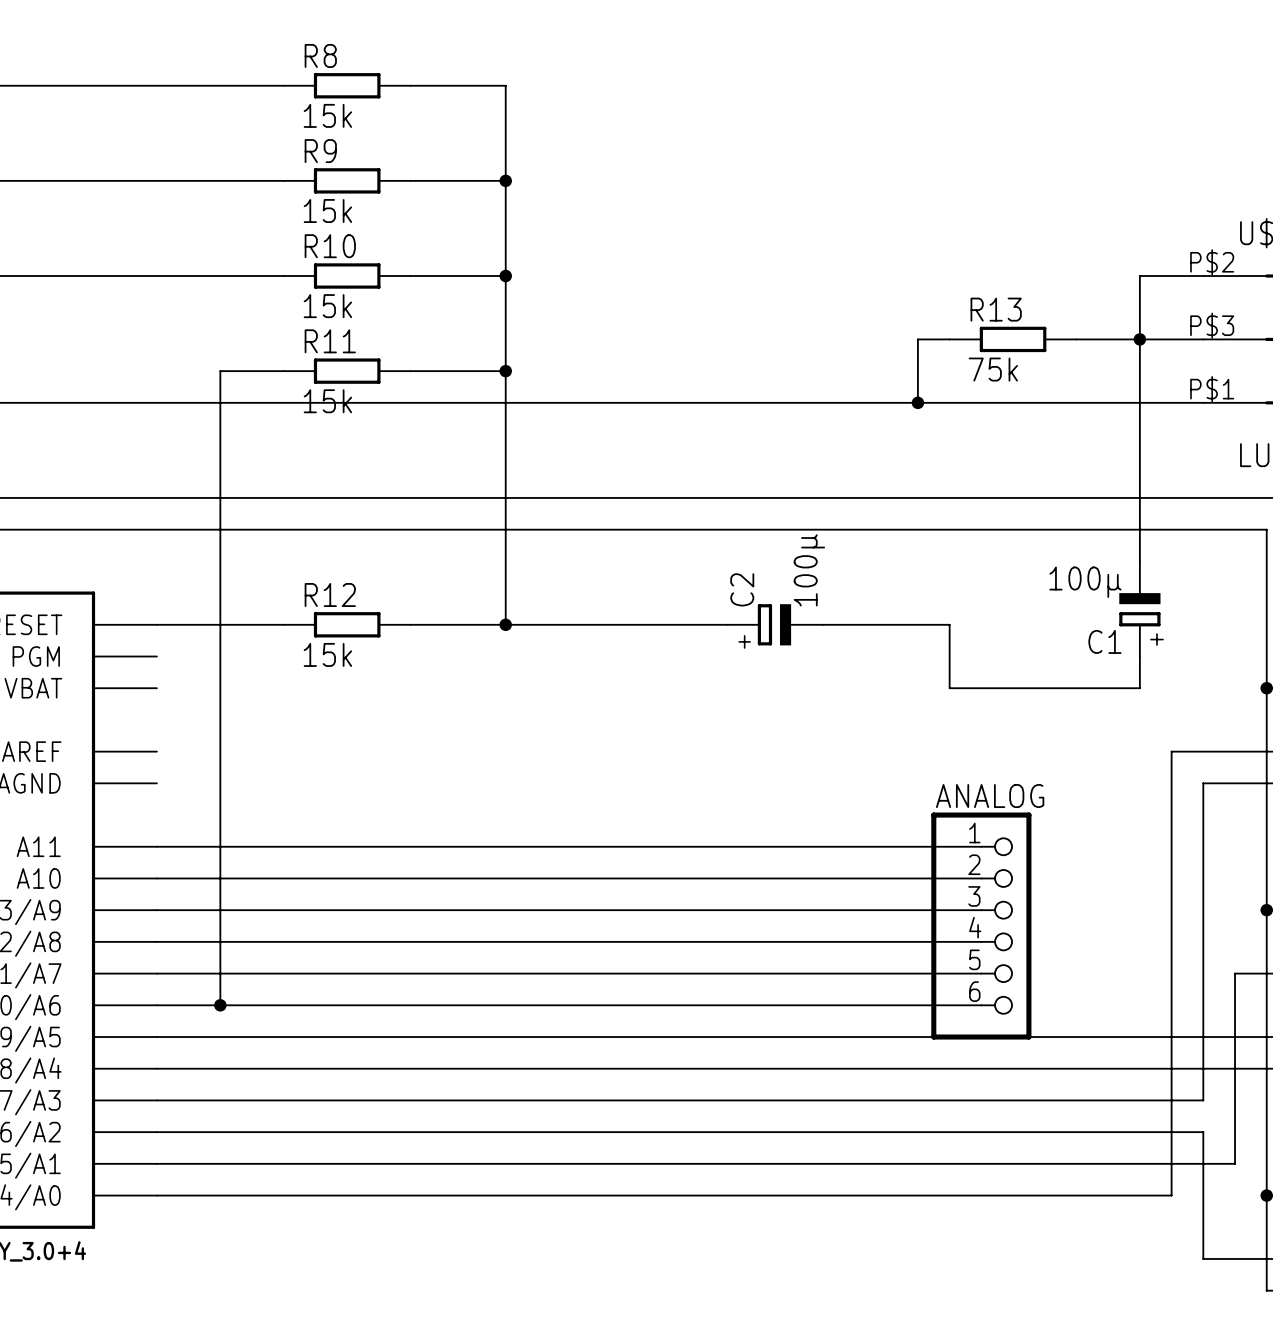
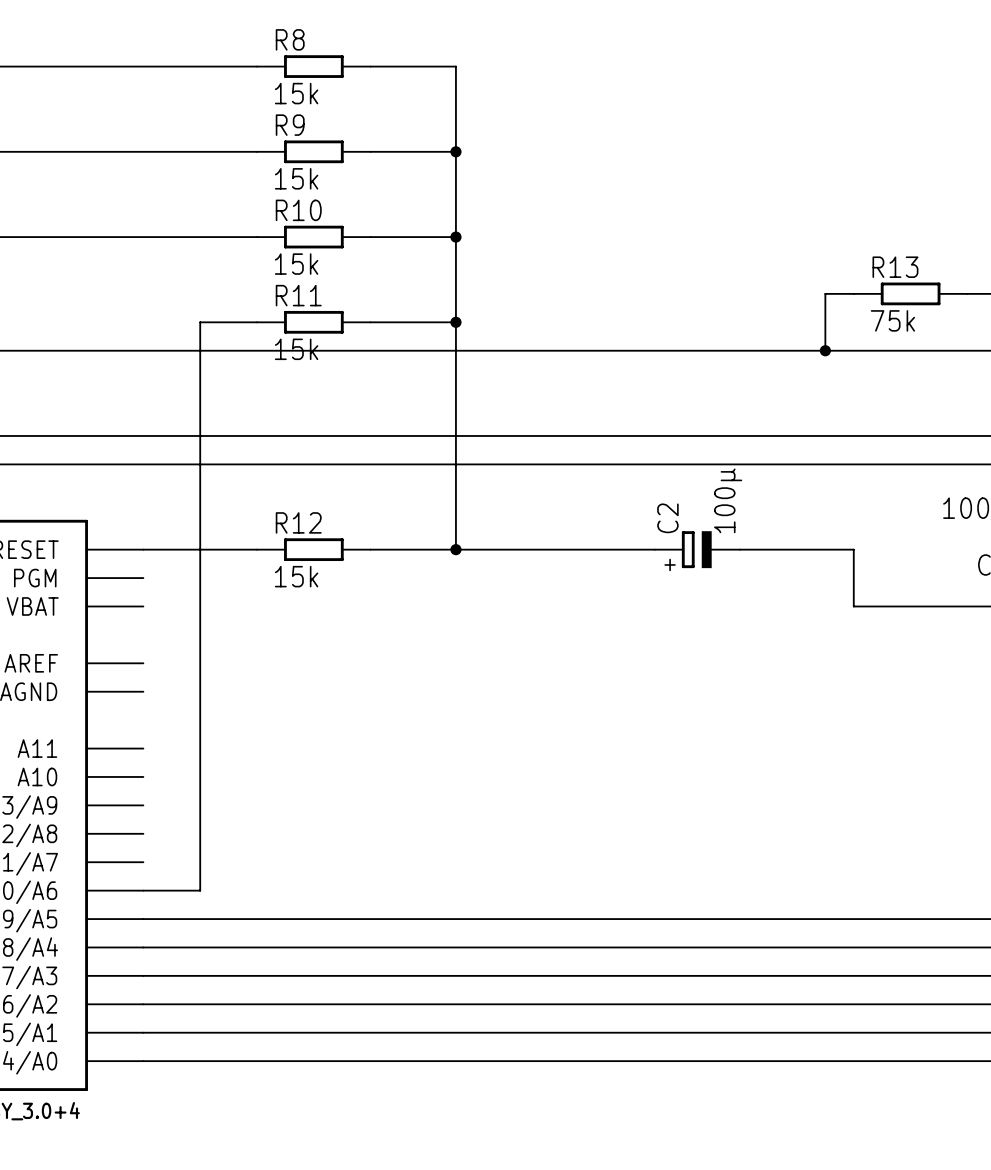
wire: (156, 846) (981, 846) -> none
wire: (156, 878) (981, 878) -> none
wire: (156, 910) (981, 910) -> none
ANALOG: (981, 926) -> none
wire: (156, 941) (981, 941) -> none
wire: (156, 973) (981, 973) -> none
wire: (220, 1005) (981, 1005) -> none
junction: (220, 1005) -> none

